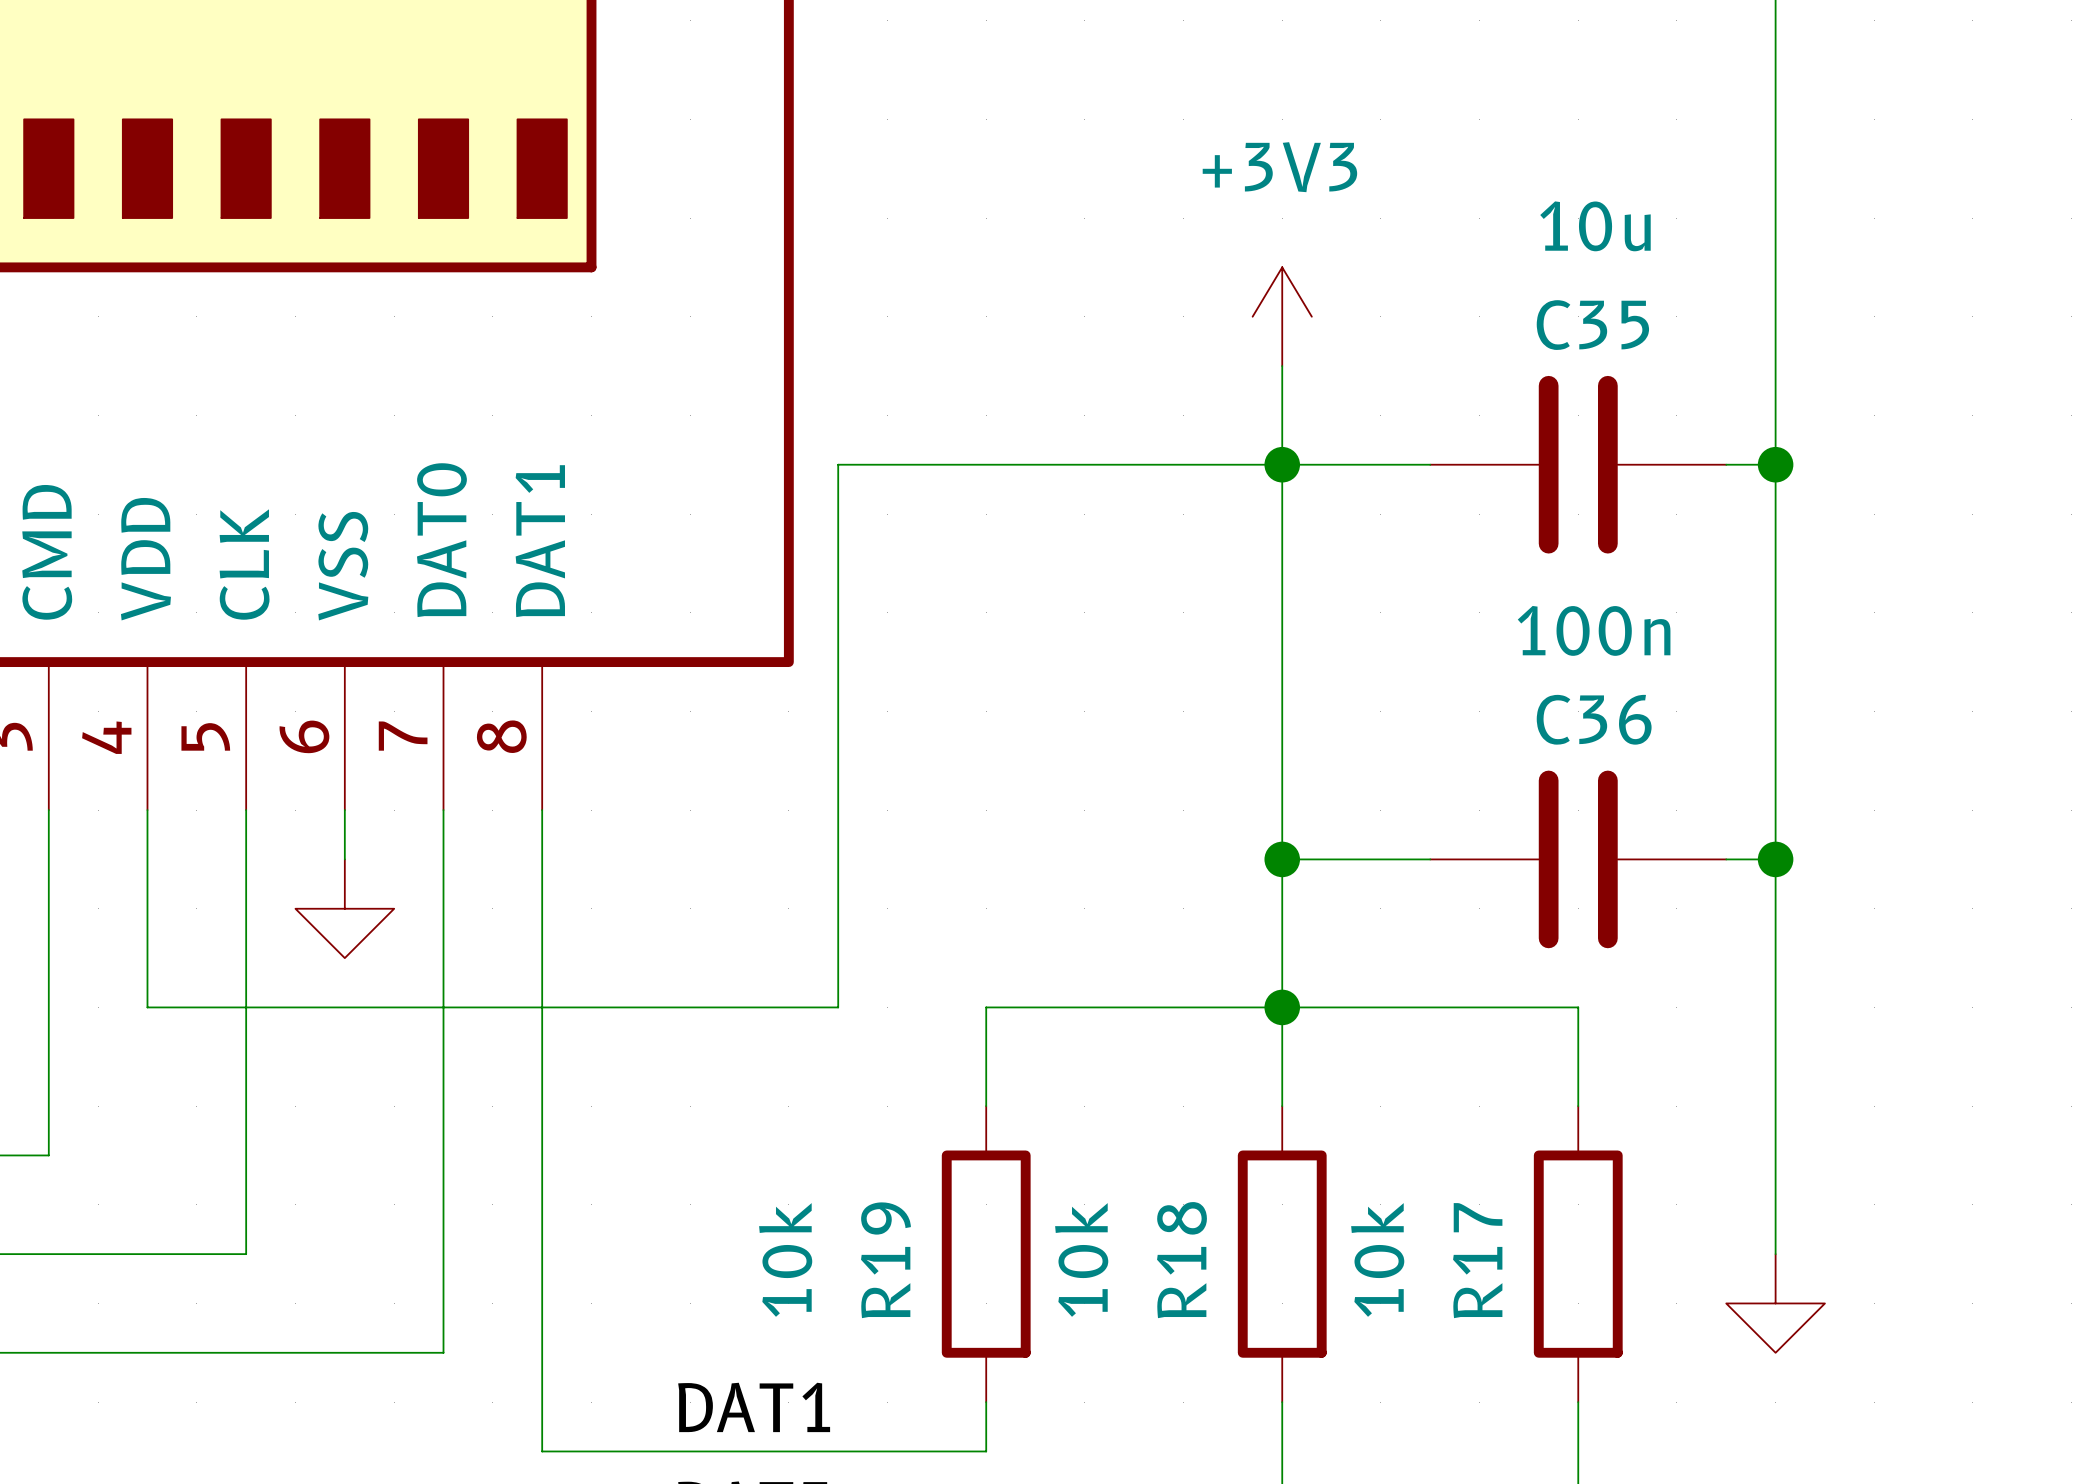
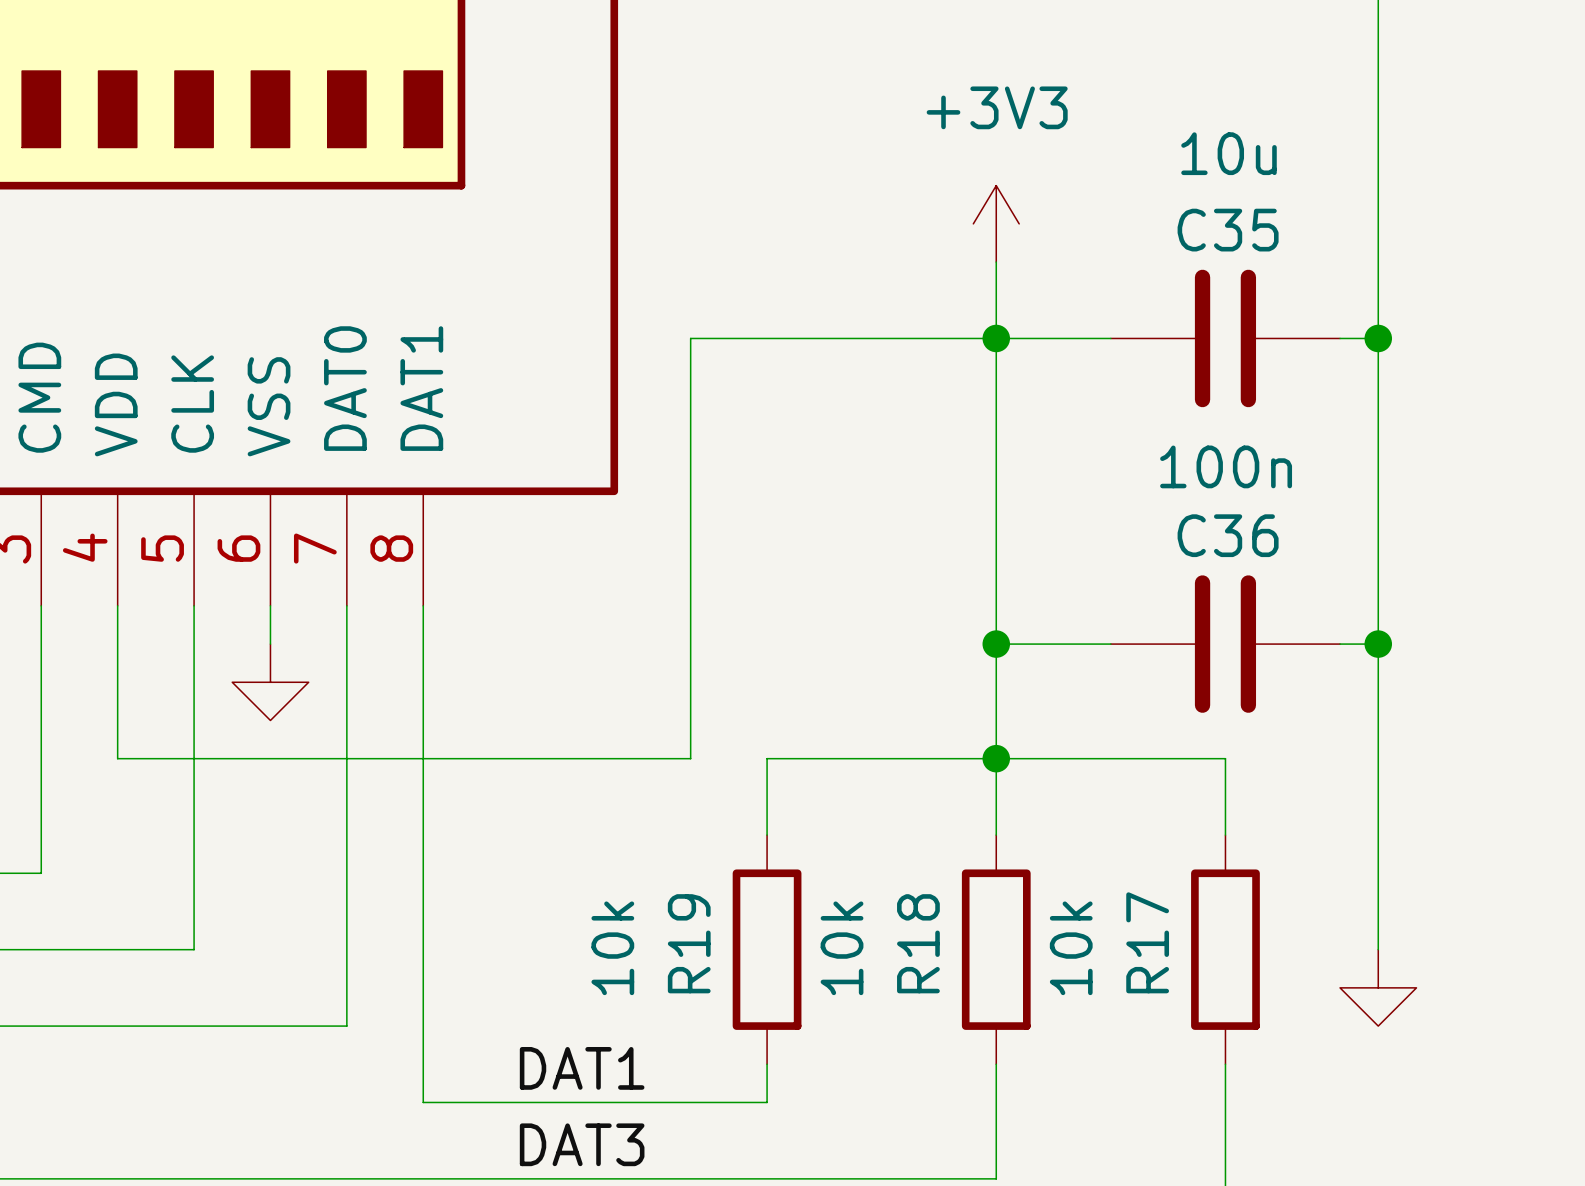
wire: (887, 464) (838, 464) (838, 1007) -> (690, 338) (690, 758) (652, 758)

